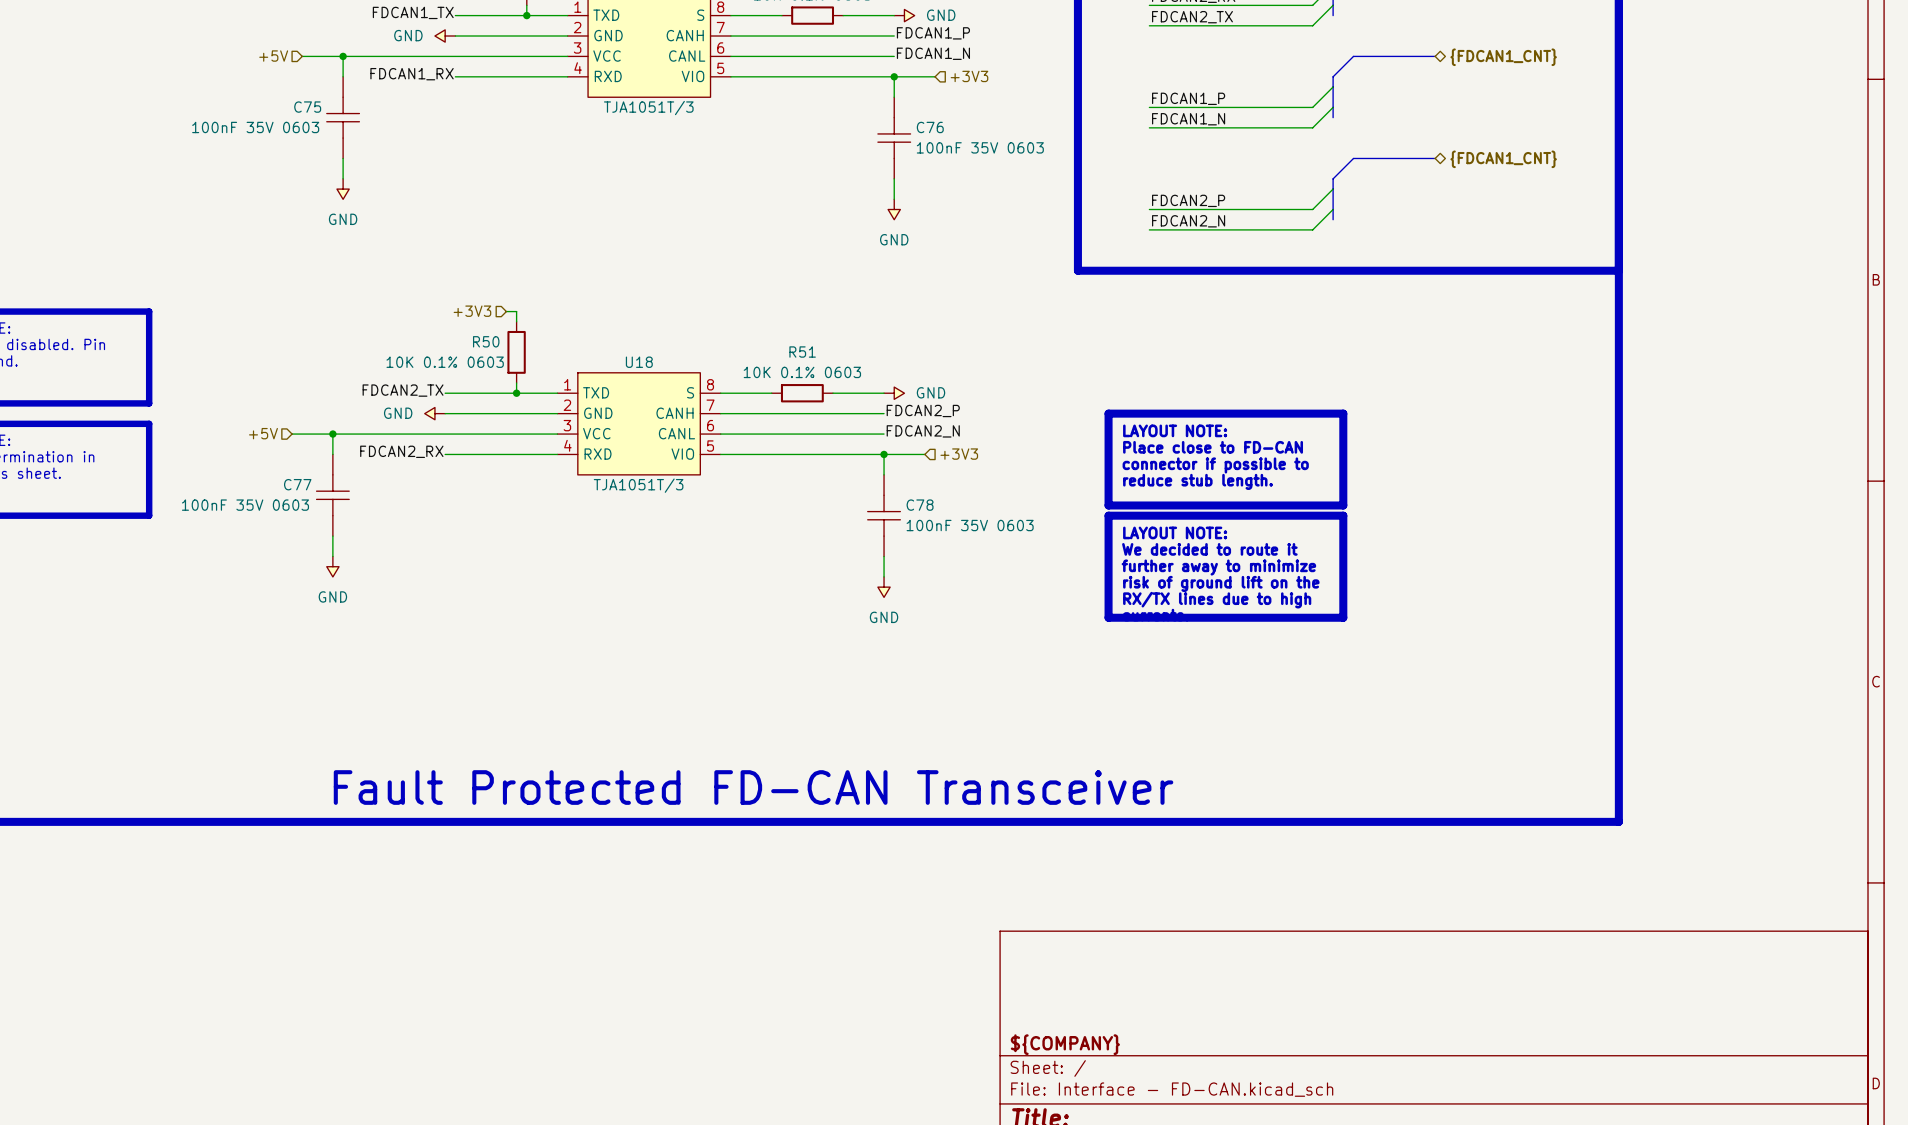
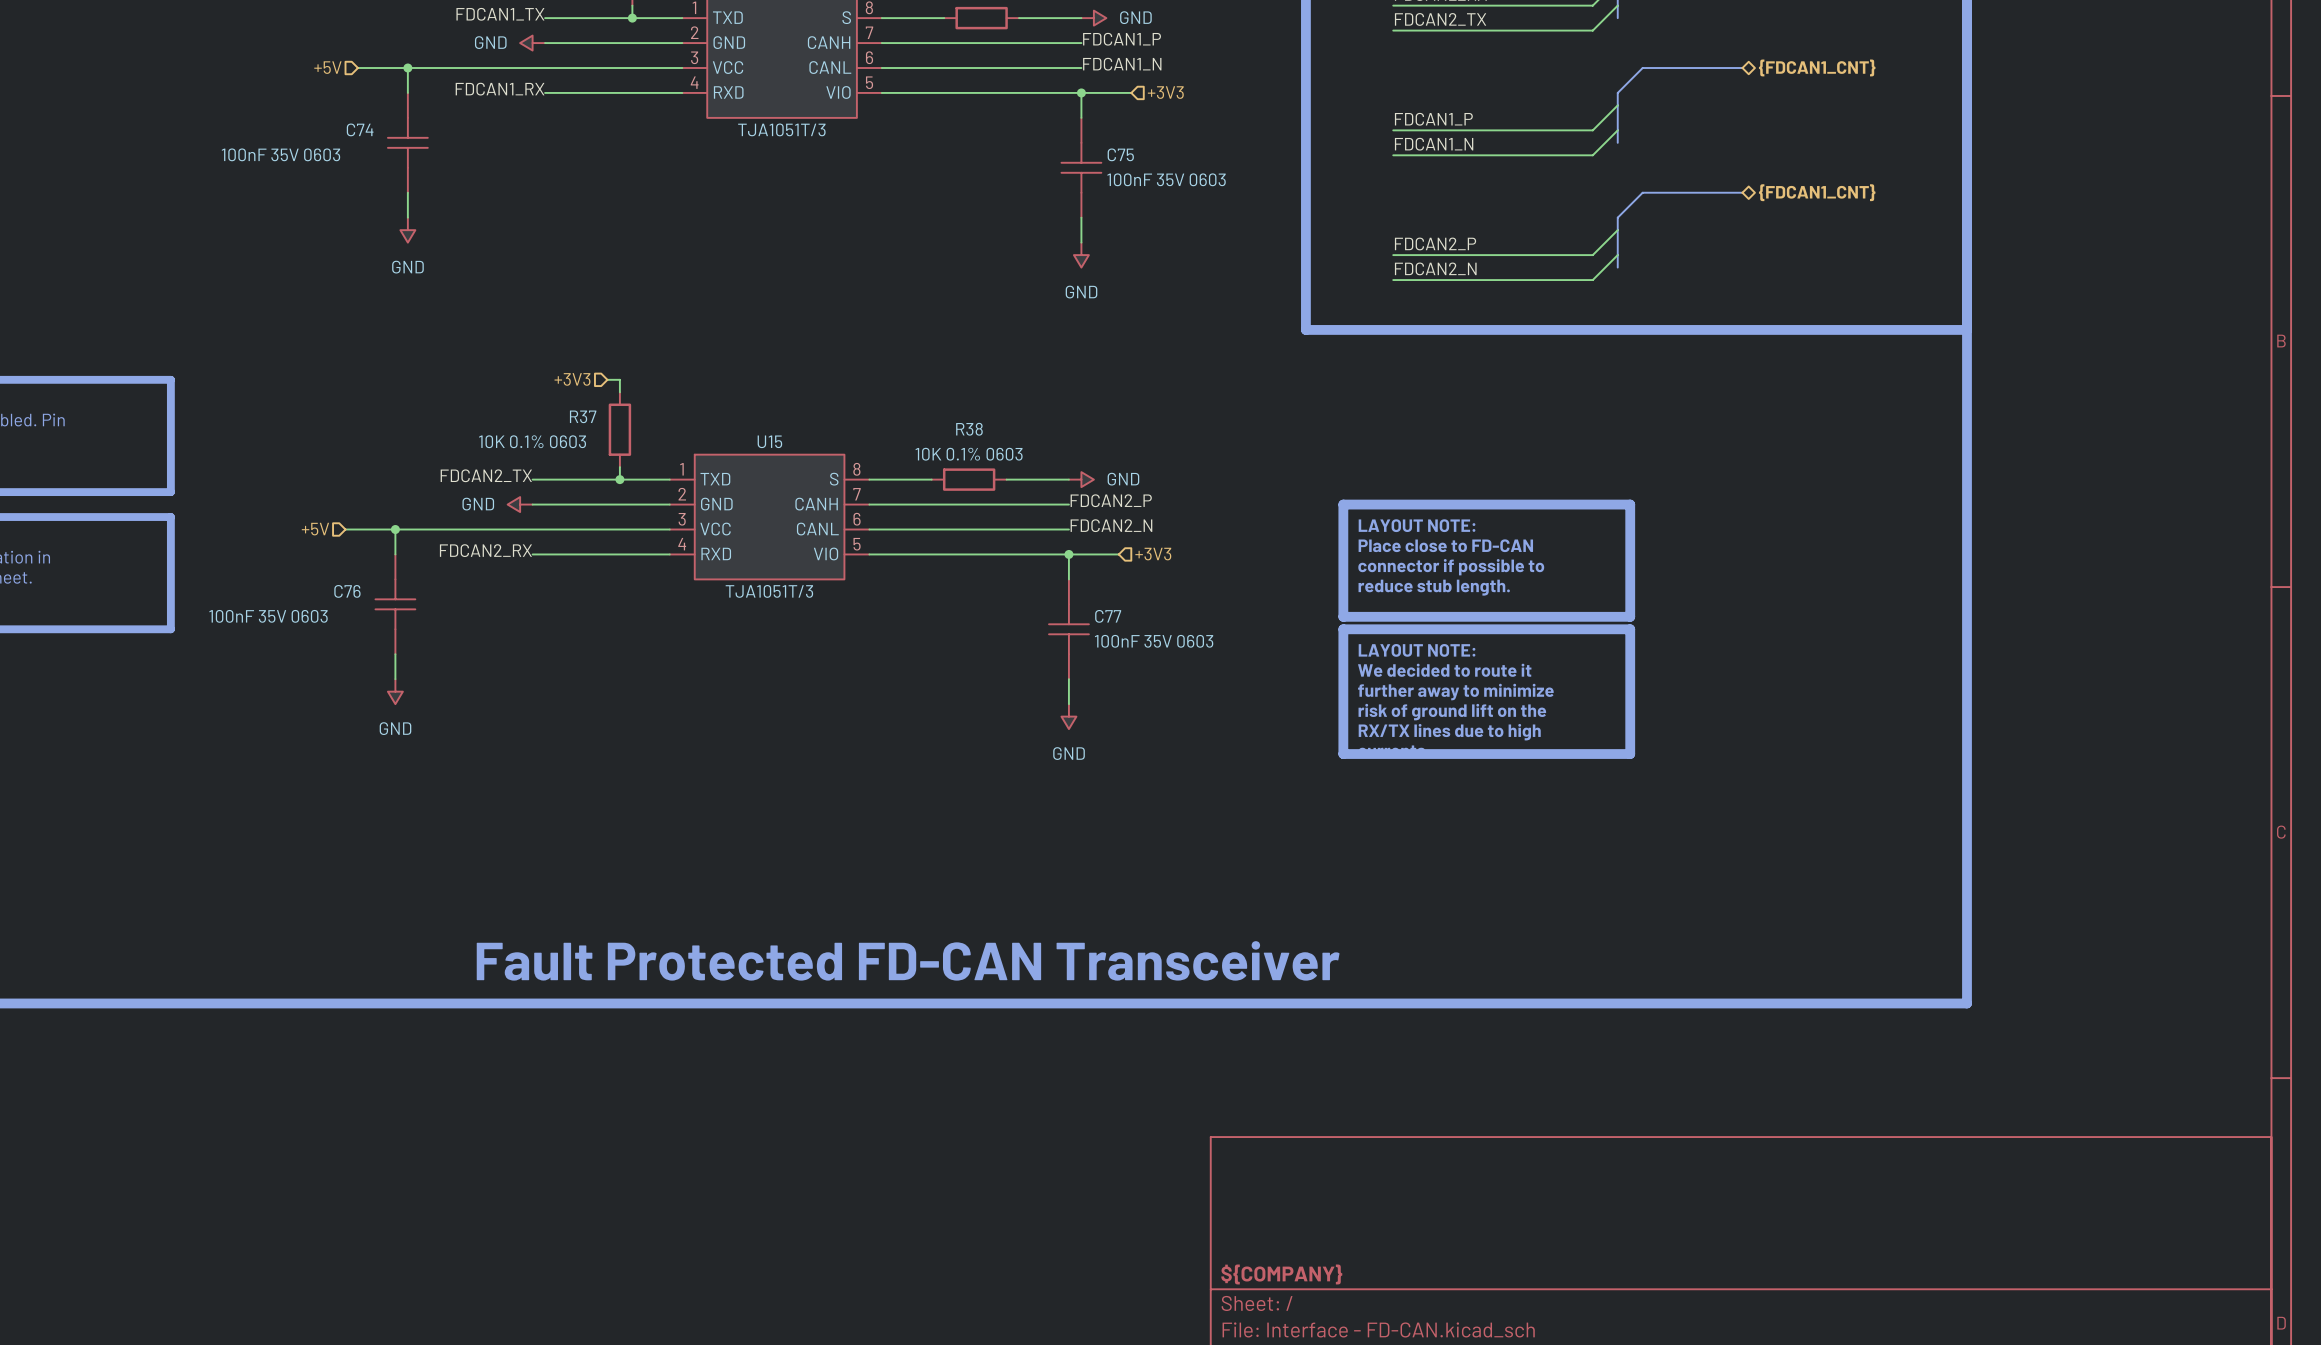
C75 name: C75 (307, 107) -> C74 (360, 129)
C76 name: C76 (930, 127) -> C75 (1120, 154)
R50 name: R50 (486, 341) -> R37 (583, 416)
R51 name: R51 (802, 352) -> R38 (969, 429)
U18 name: U18 (639, 362) -> U15 (769, 441)
C77 name: C77 (297, 484) -> C76 (347, 591)
C78 name: C78 (920, 505) -> C77 (1108, 616)

